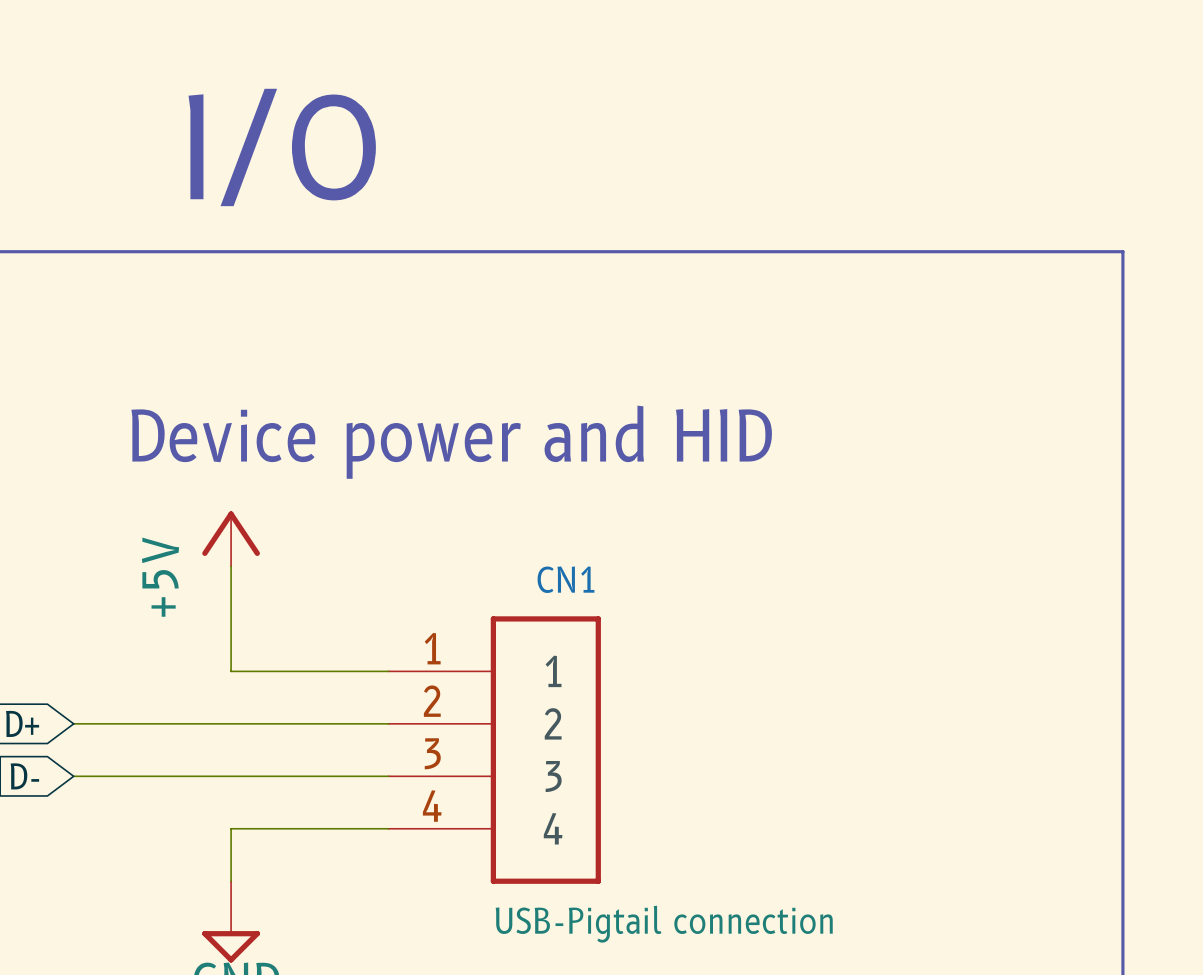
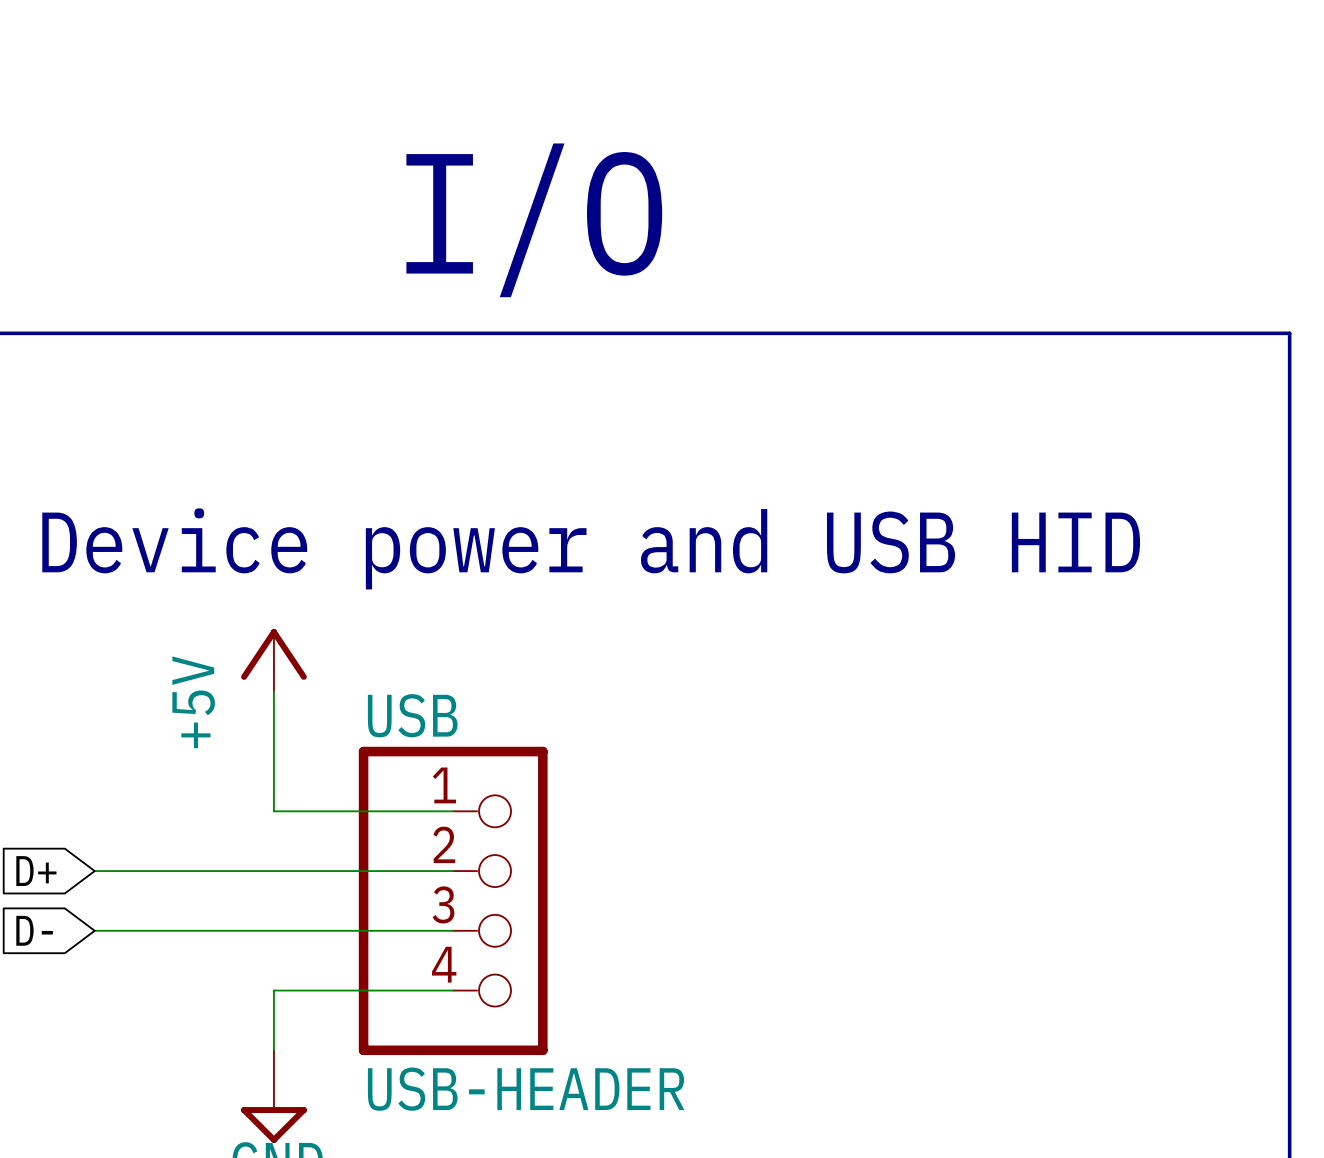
text position: I/O (282, 147) -> I/O (534, 220)
text: Device power and HID (451, 442) -> Device power and USB HID (591, 548)
USB: none -> USB-HEADER (453, 900)
CN1: USB-Pigtail connection (494, 750) -> none

